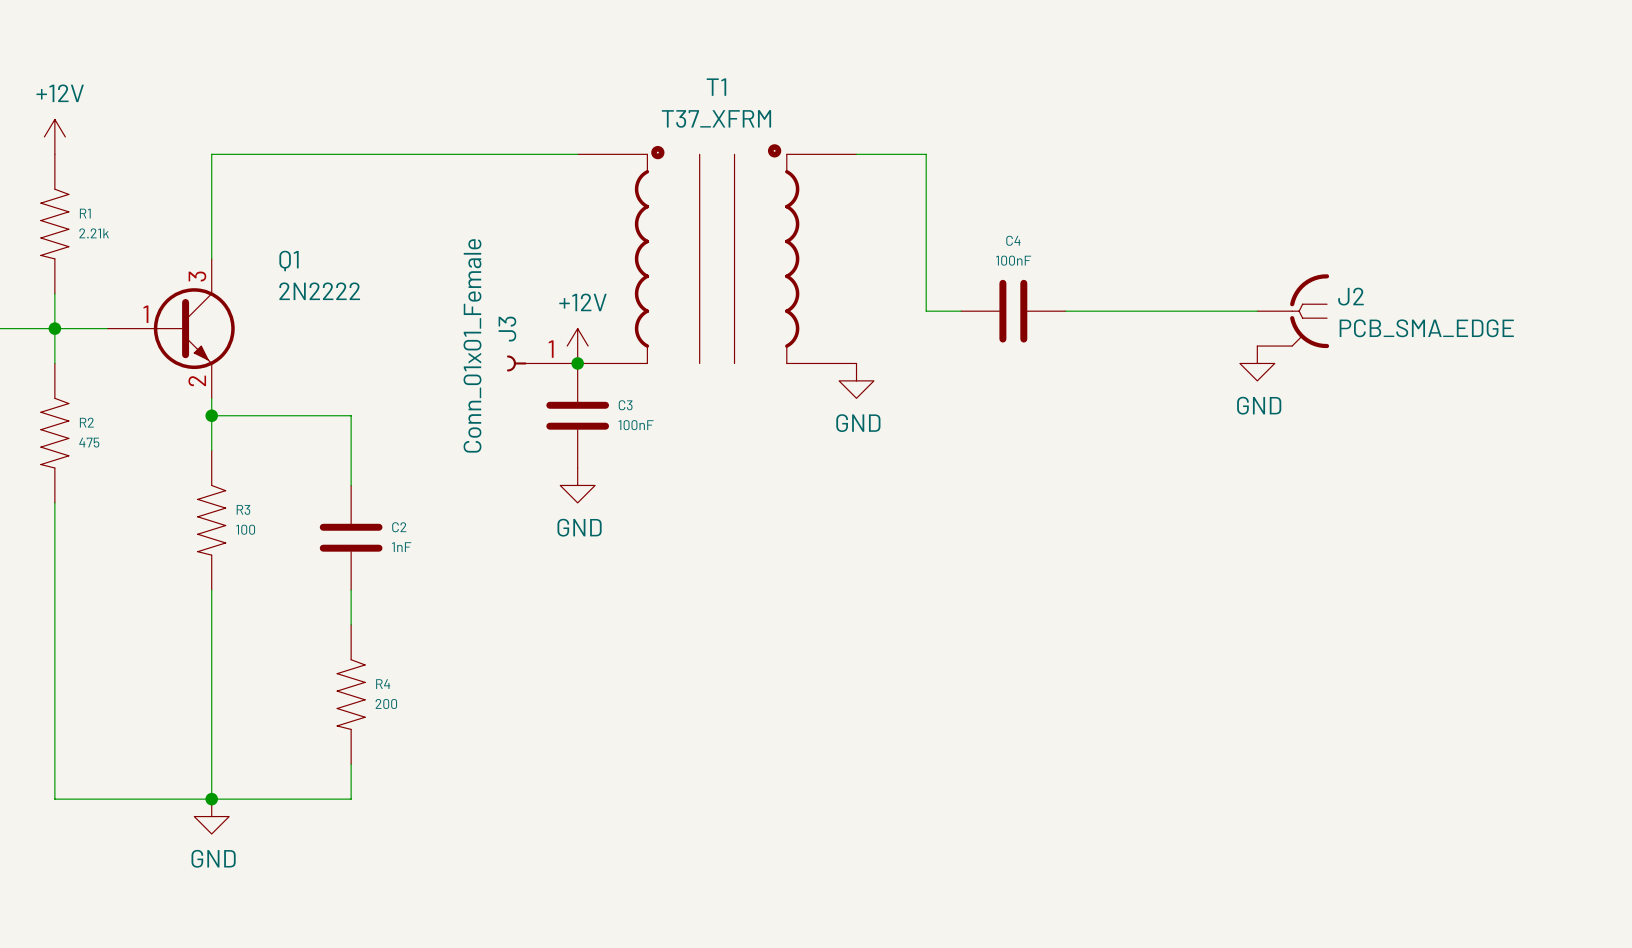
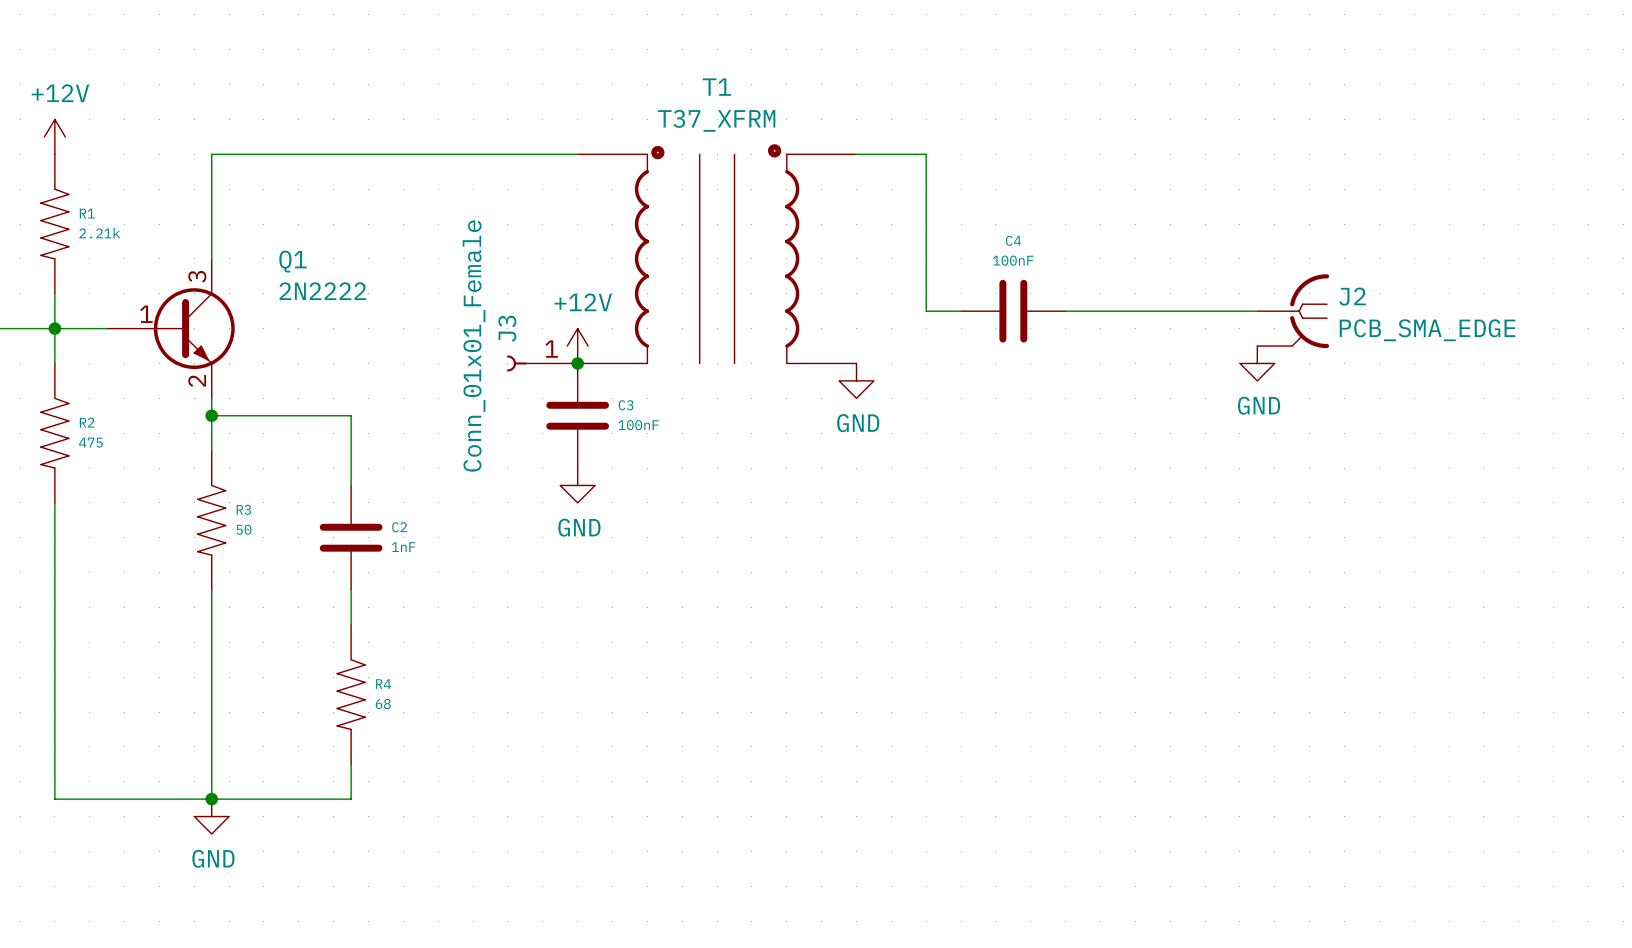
R3 value: 100 (245, 529) -> 50 (243, 529)
R4 value: 200 (386, 703) -> 68 (383, 703)

